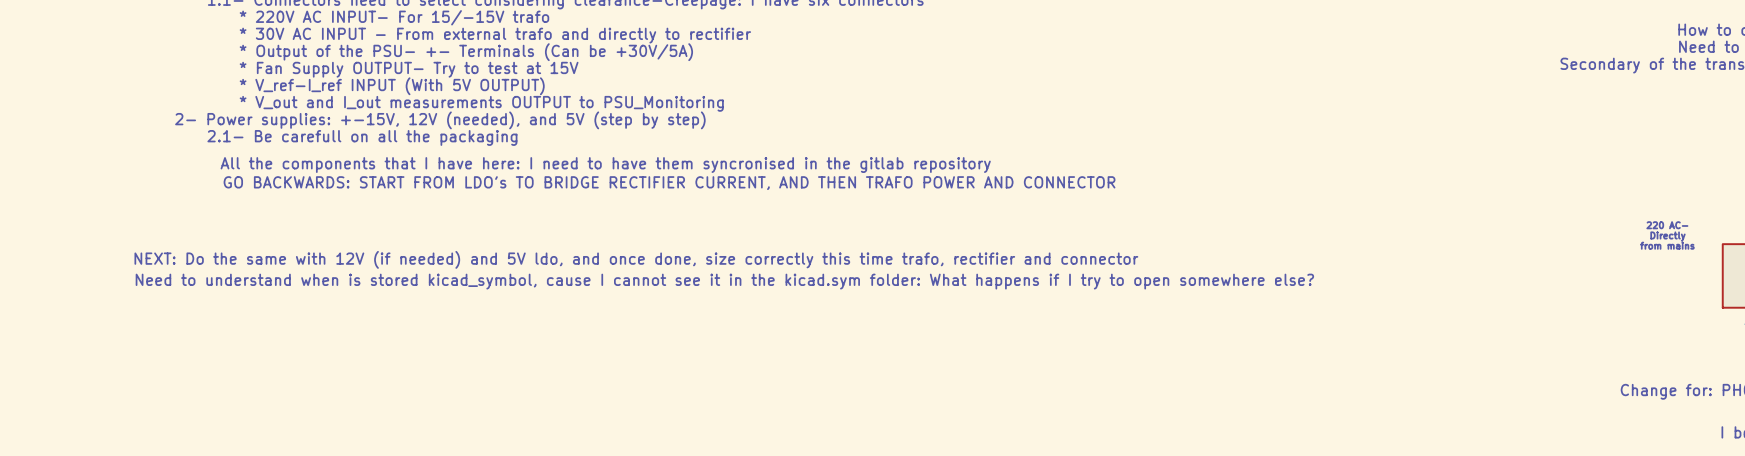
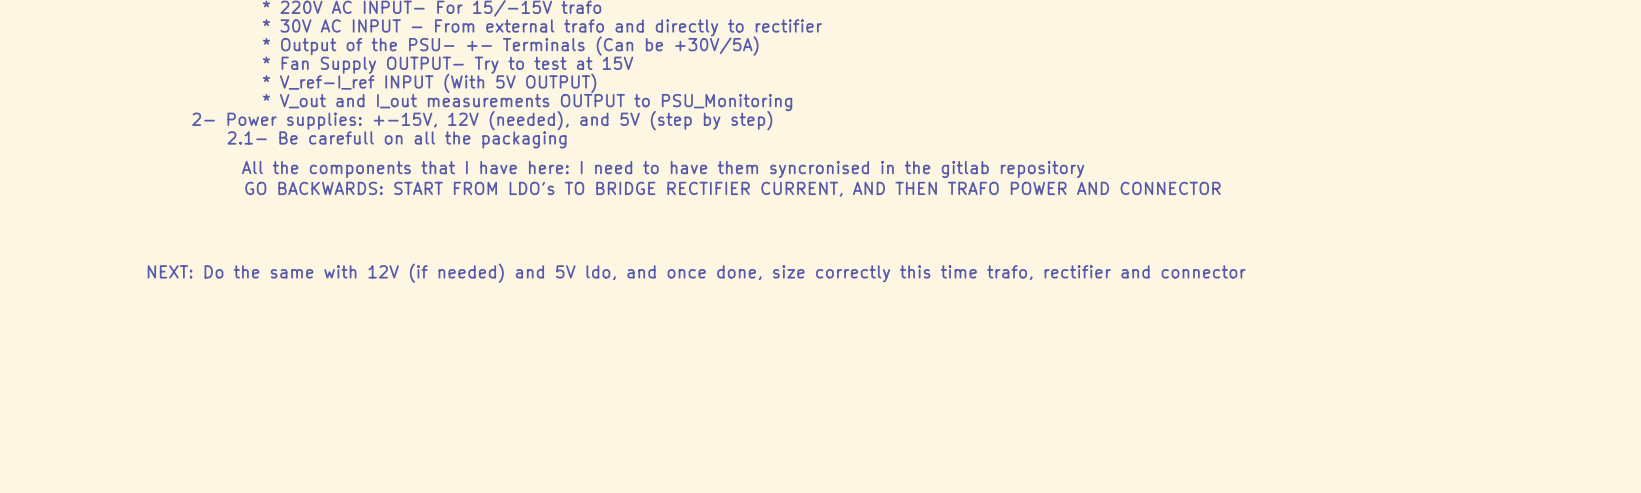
text: Need to understand when is stored kicad_symbol, cause I cannot see it in the kicad.sym folder: What happens if I try to open somewhere else? (724, 281) -> none

